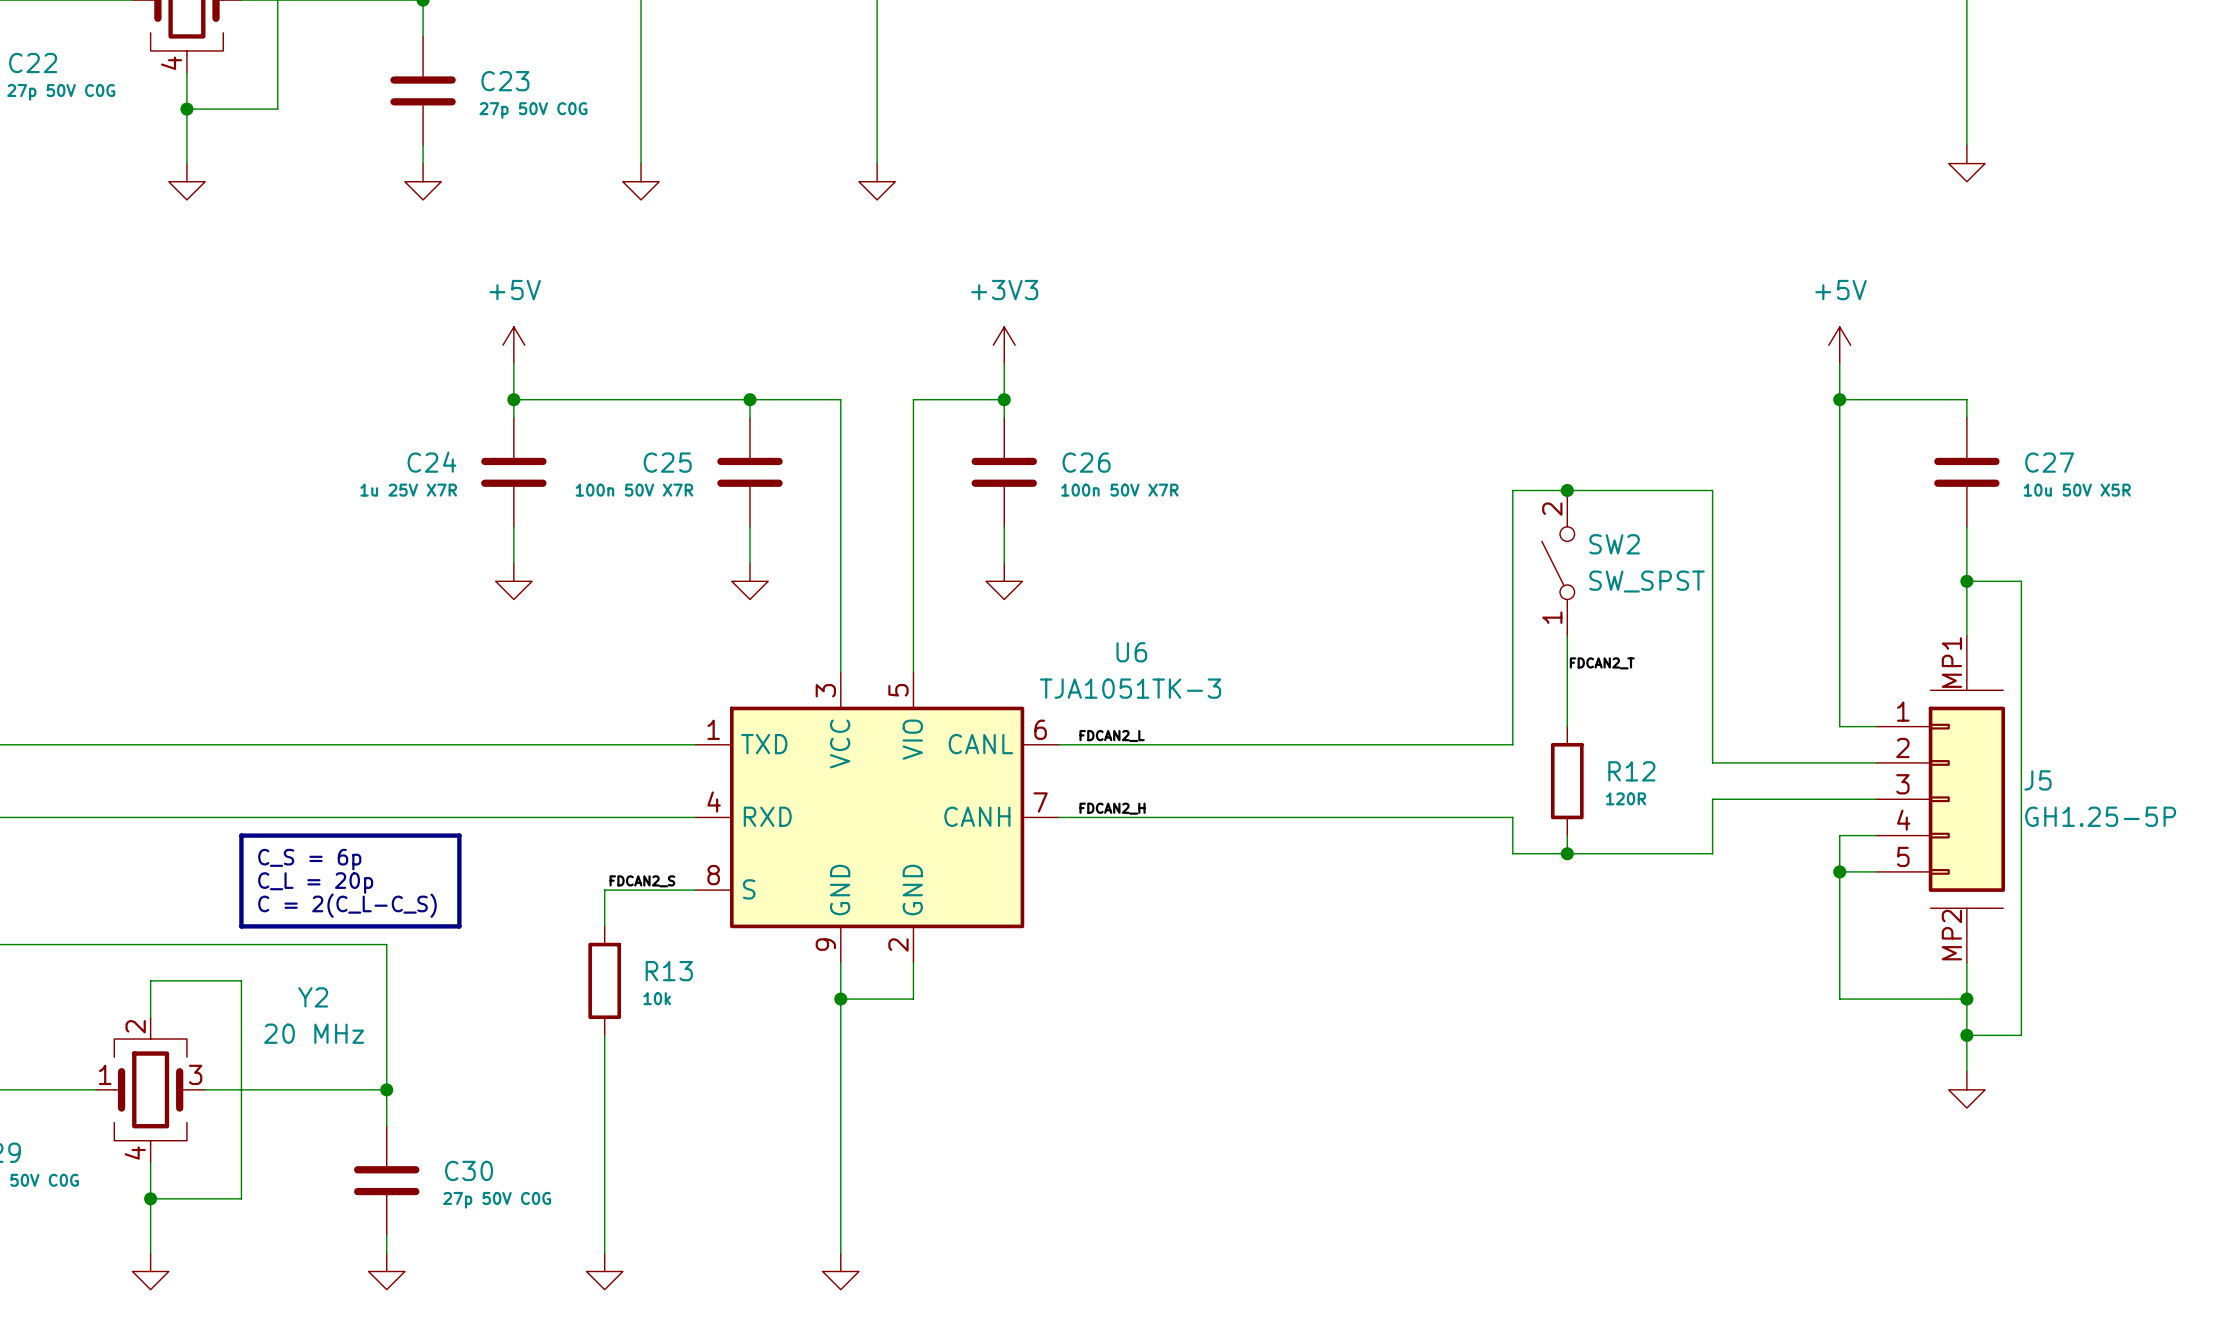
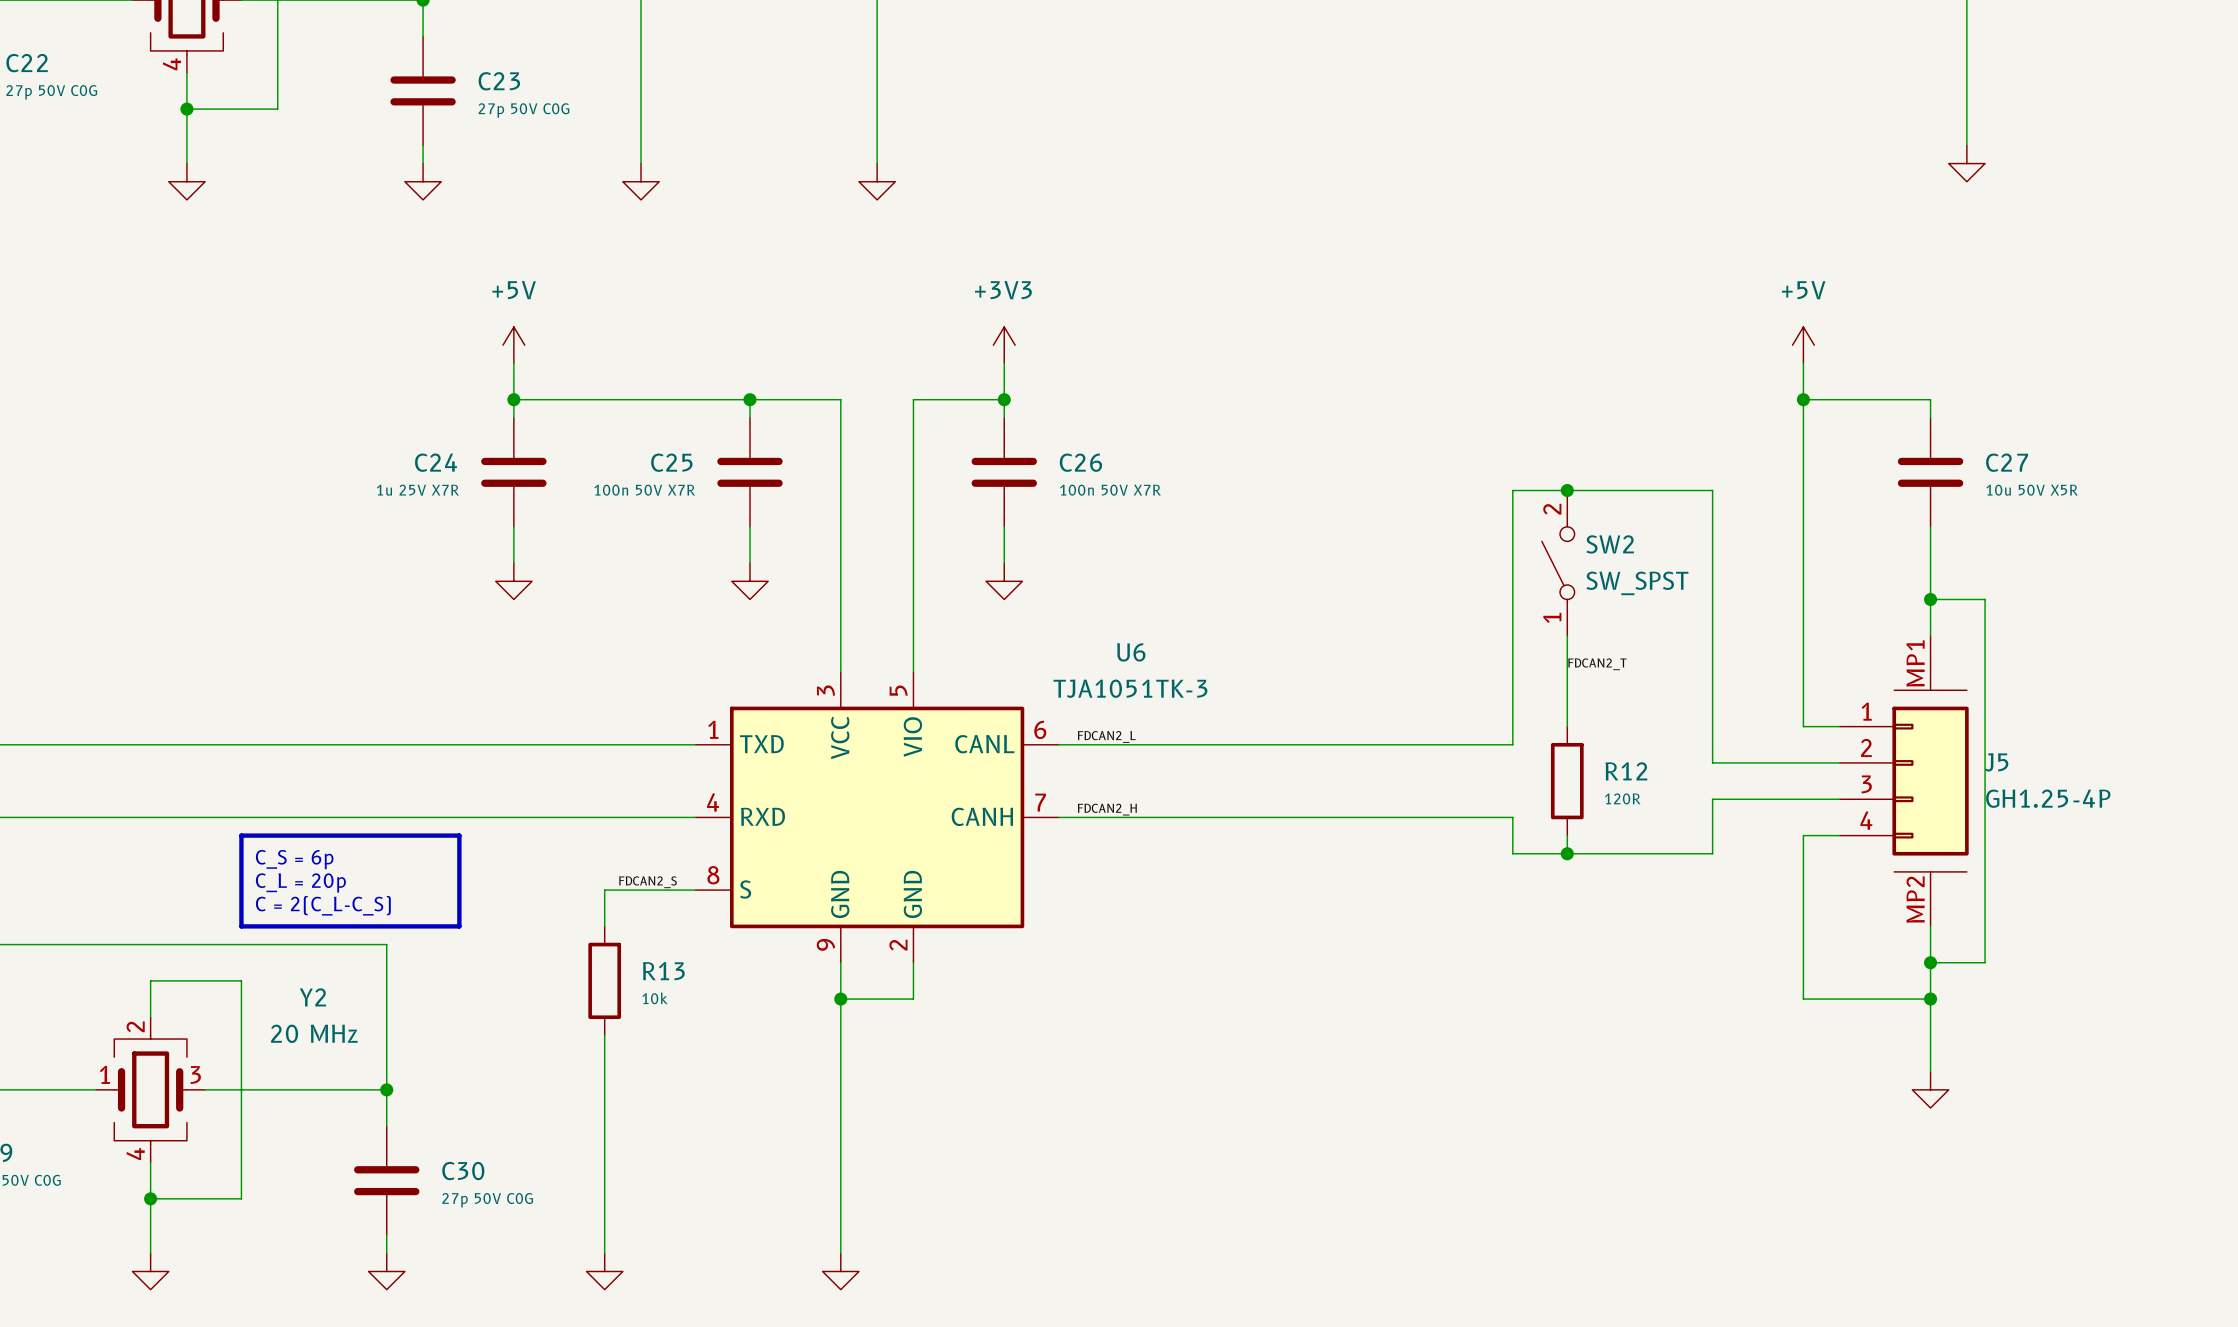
power symbol position: +5V (1839, 345) -> +5V (1803, 345)
wire: (1839, 363) (1839, 726) (1876, 726) -> (1803, 363) (1803, 726) (1839, 726)
wire: none -> (1803, 399) (1839, 399)
junction position: (1839, 399) -> (1803, 399)
wire: (1930, 399) (1966, 399) (1966, 417) -> (1930, 399) (1930, 417)
C27 position: (1966, 472) -> (1930, 472)
wire: (1966, 526) (1966, 635) -> (1930, 526) (1930, 635)
wire: (1966, 581) (2021, 581) (2021, 1035) (1966, 1035) -> none
junction position: (1966, 581) -> (1930, 599)
wire: none -> (1930, 599) (1985, 599) (1985, 962) (1930, 962)
J5 symbol: [1876, 635, 2006, 963] -> [1839, 635, 1969, 927]
J5 value: GH1.25-5P (2100, 816) -> GH1.25-4P (2048, 798)
wire: (1876, 835) (1839, 835) (1839, 999) -> (1839, 835) (1803, 835) (1803, 999) (1839, 999)
wire: (1839, 871) (1876, 871) -> none
junction: (1839, 871) -> none
wire: none -> (1930, 926) (1930, 1071)
junction: none -> (1930, 962)
wire: (1966, 962) (1966, 1071) -> none
wire: (1930, 999) (1966, 999) -> none
junction: none -> (1930, 999)
junction: (1966, 999) -> none
junction: (1966, 1035) -> none
power symbol position: (1966, 1089) -> (1930, 1089)

